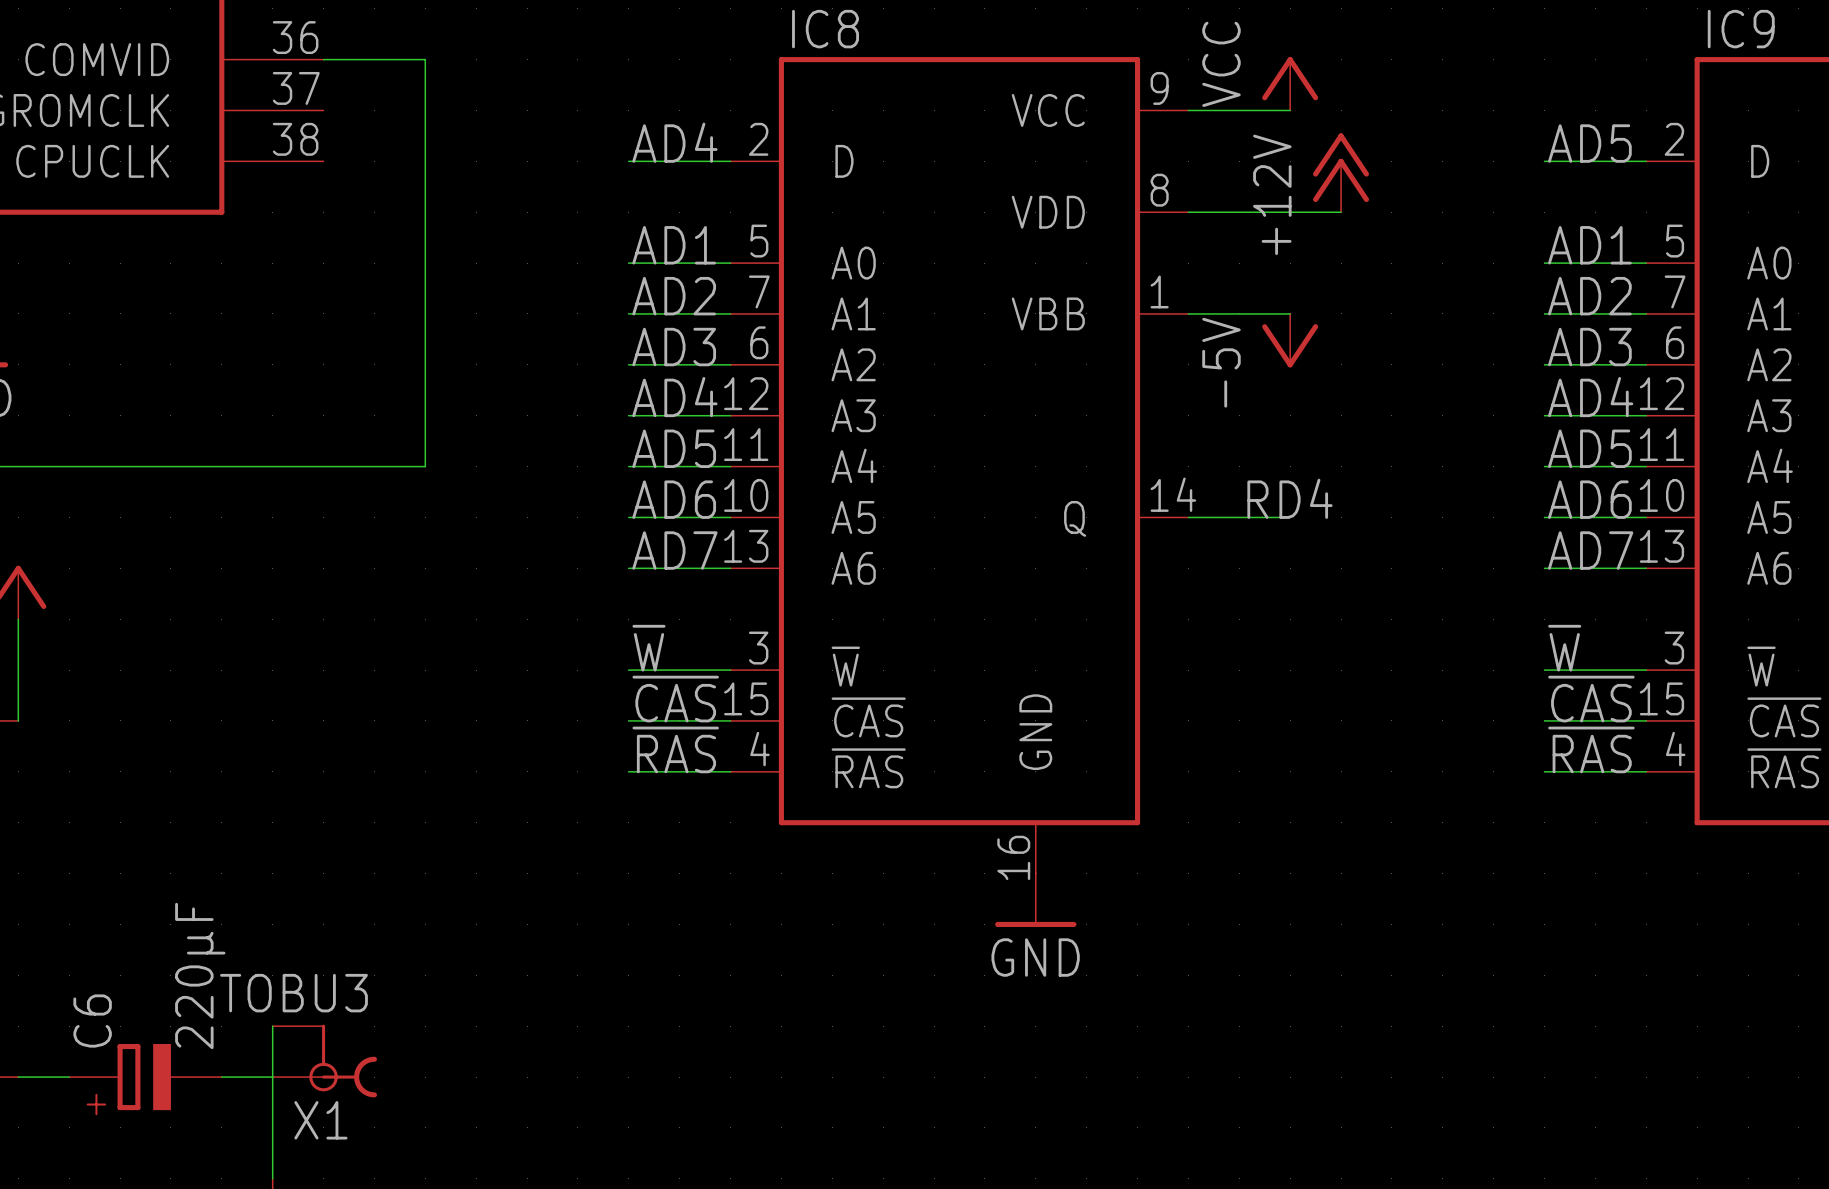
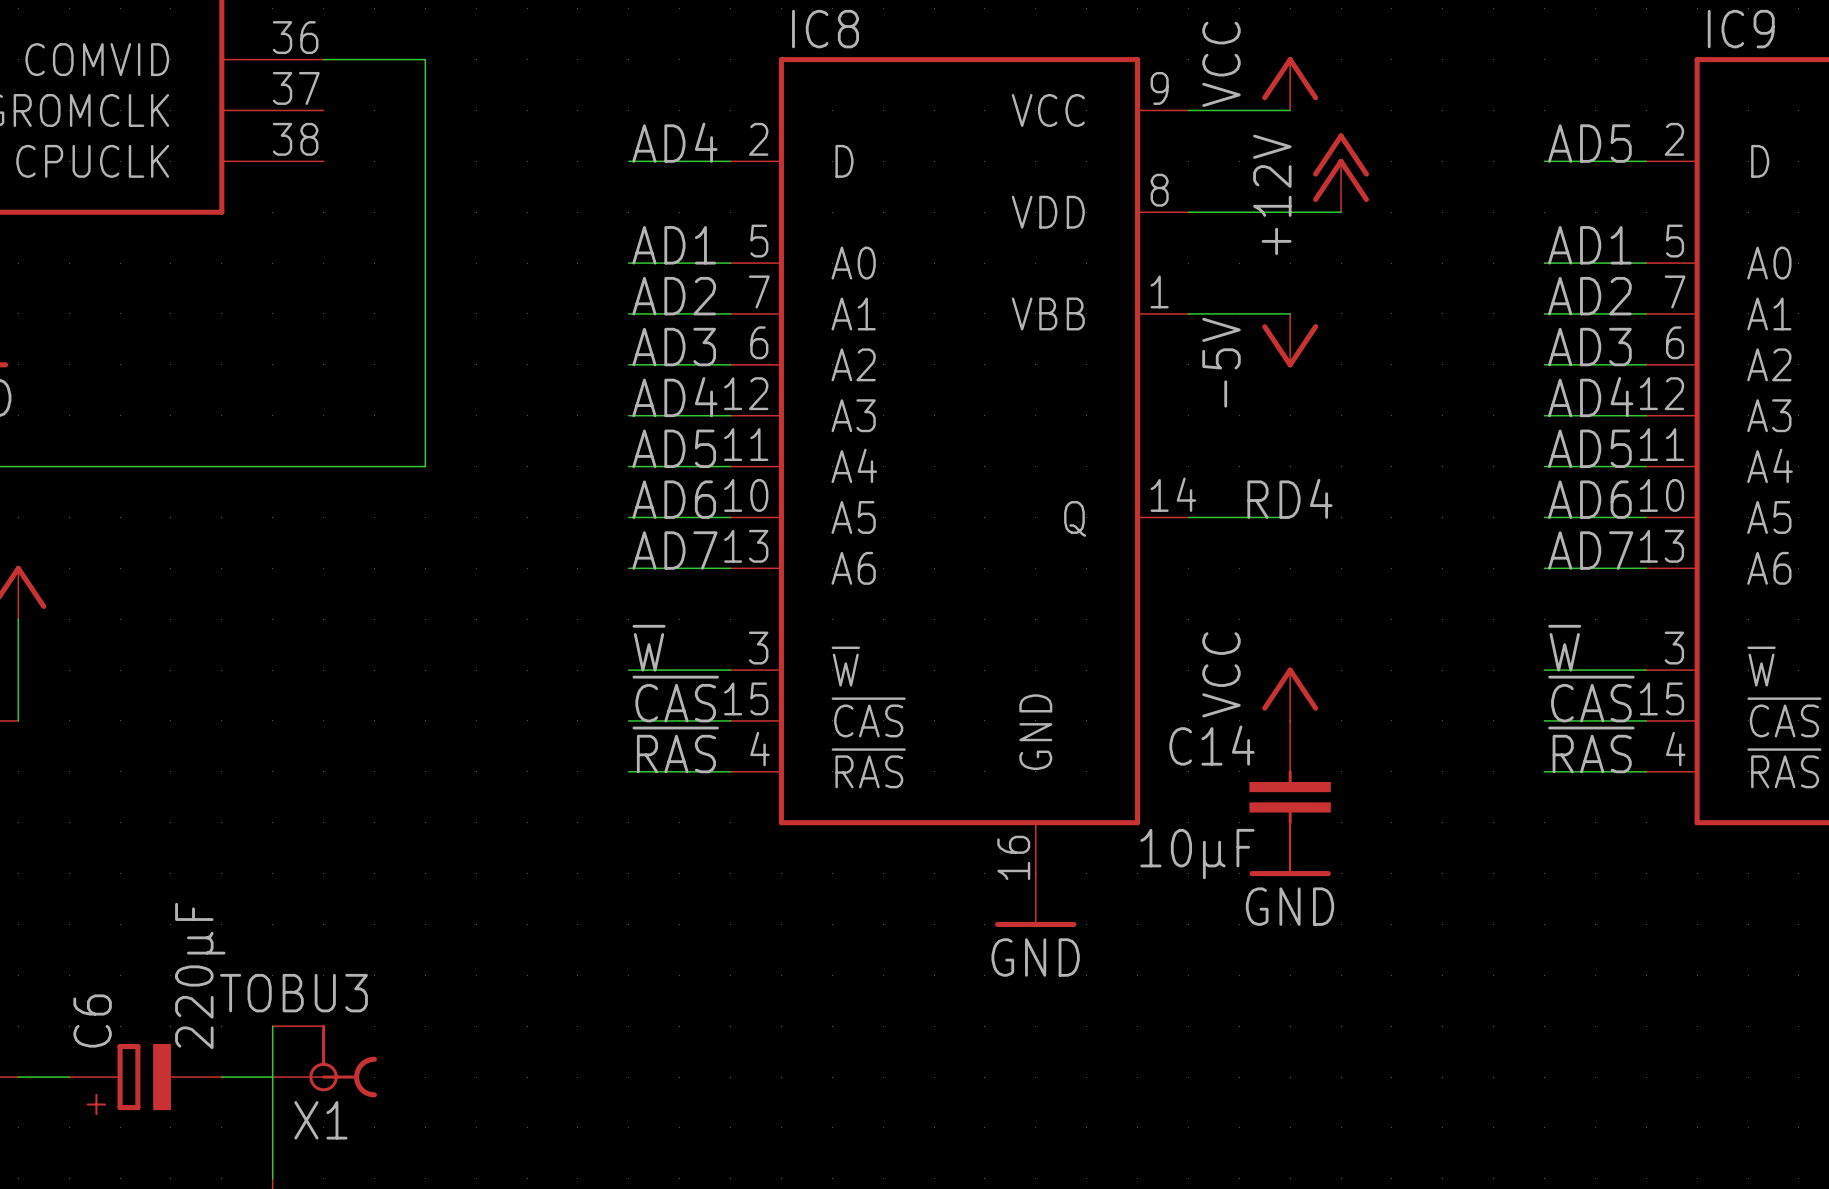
power symbol: none -> VCC (1290, 694)
C14: none -> 10µF (1290, 797)
power symbol: none -> GND (1290, 849)

